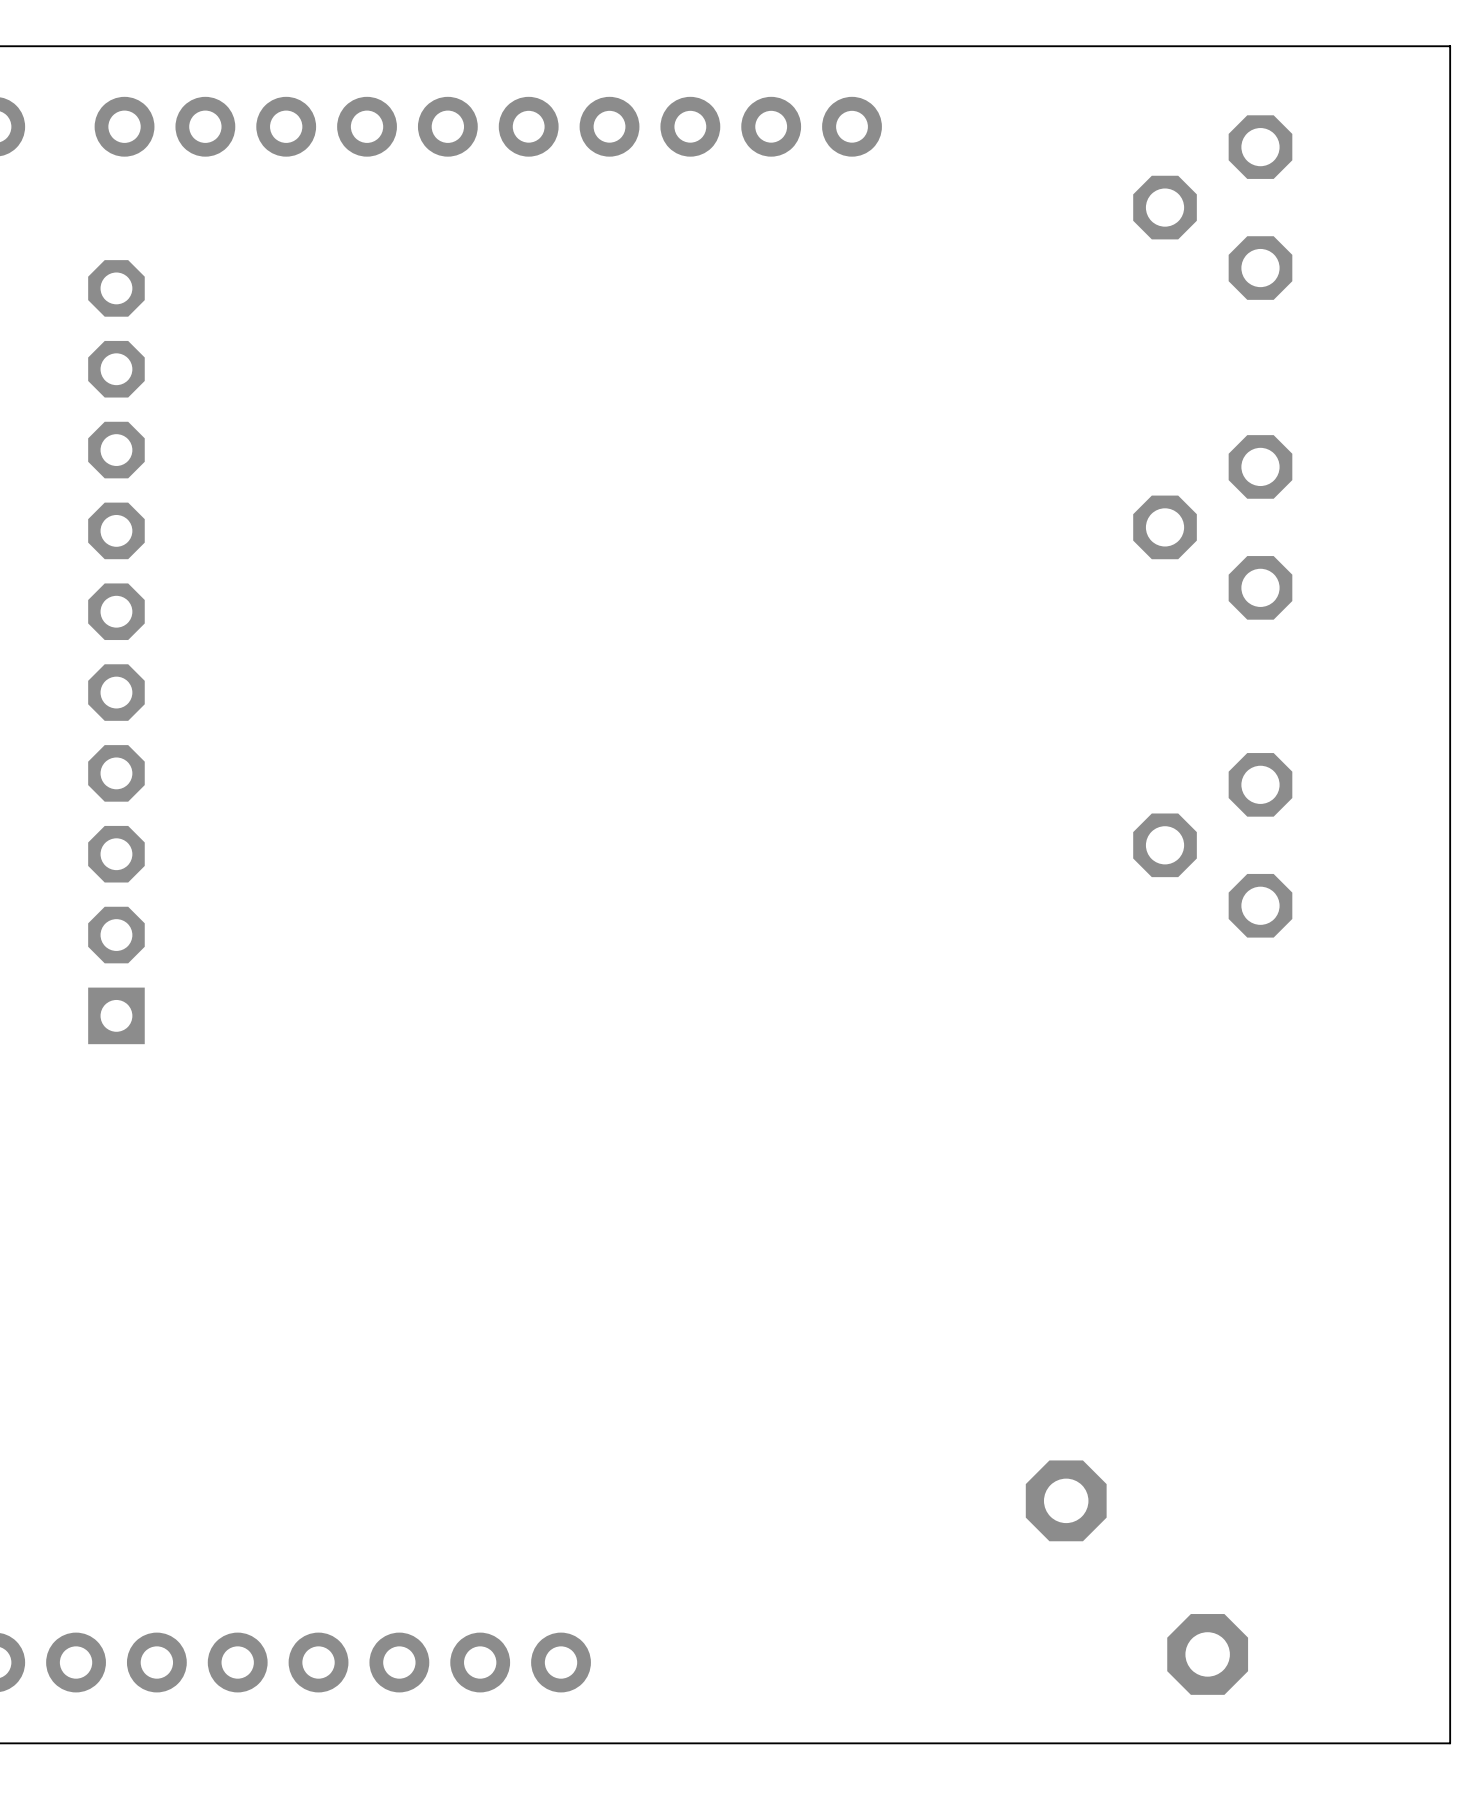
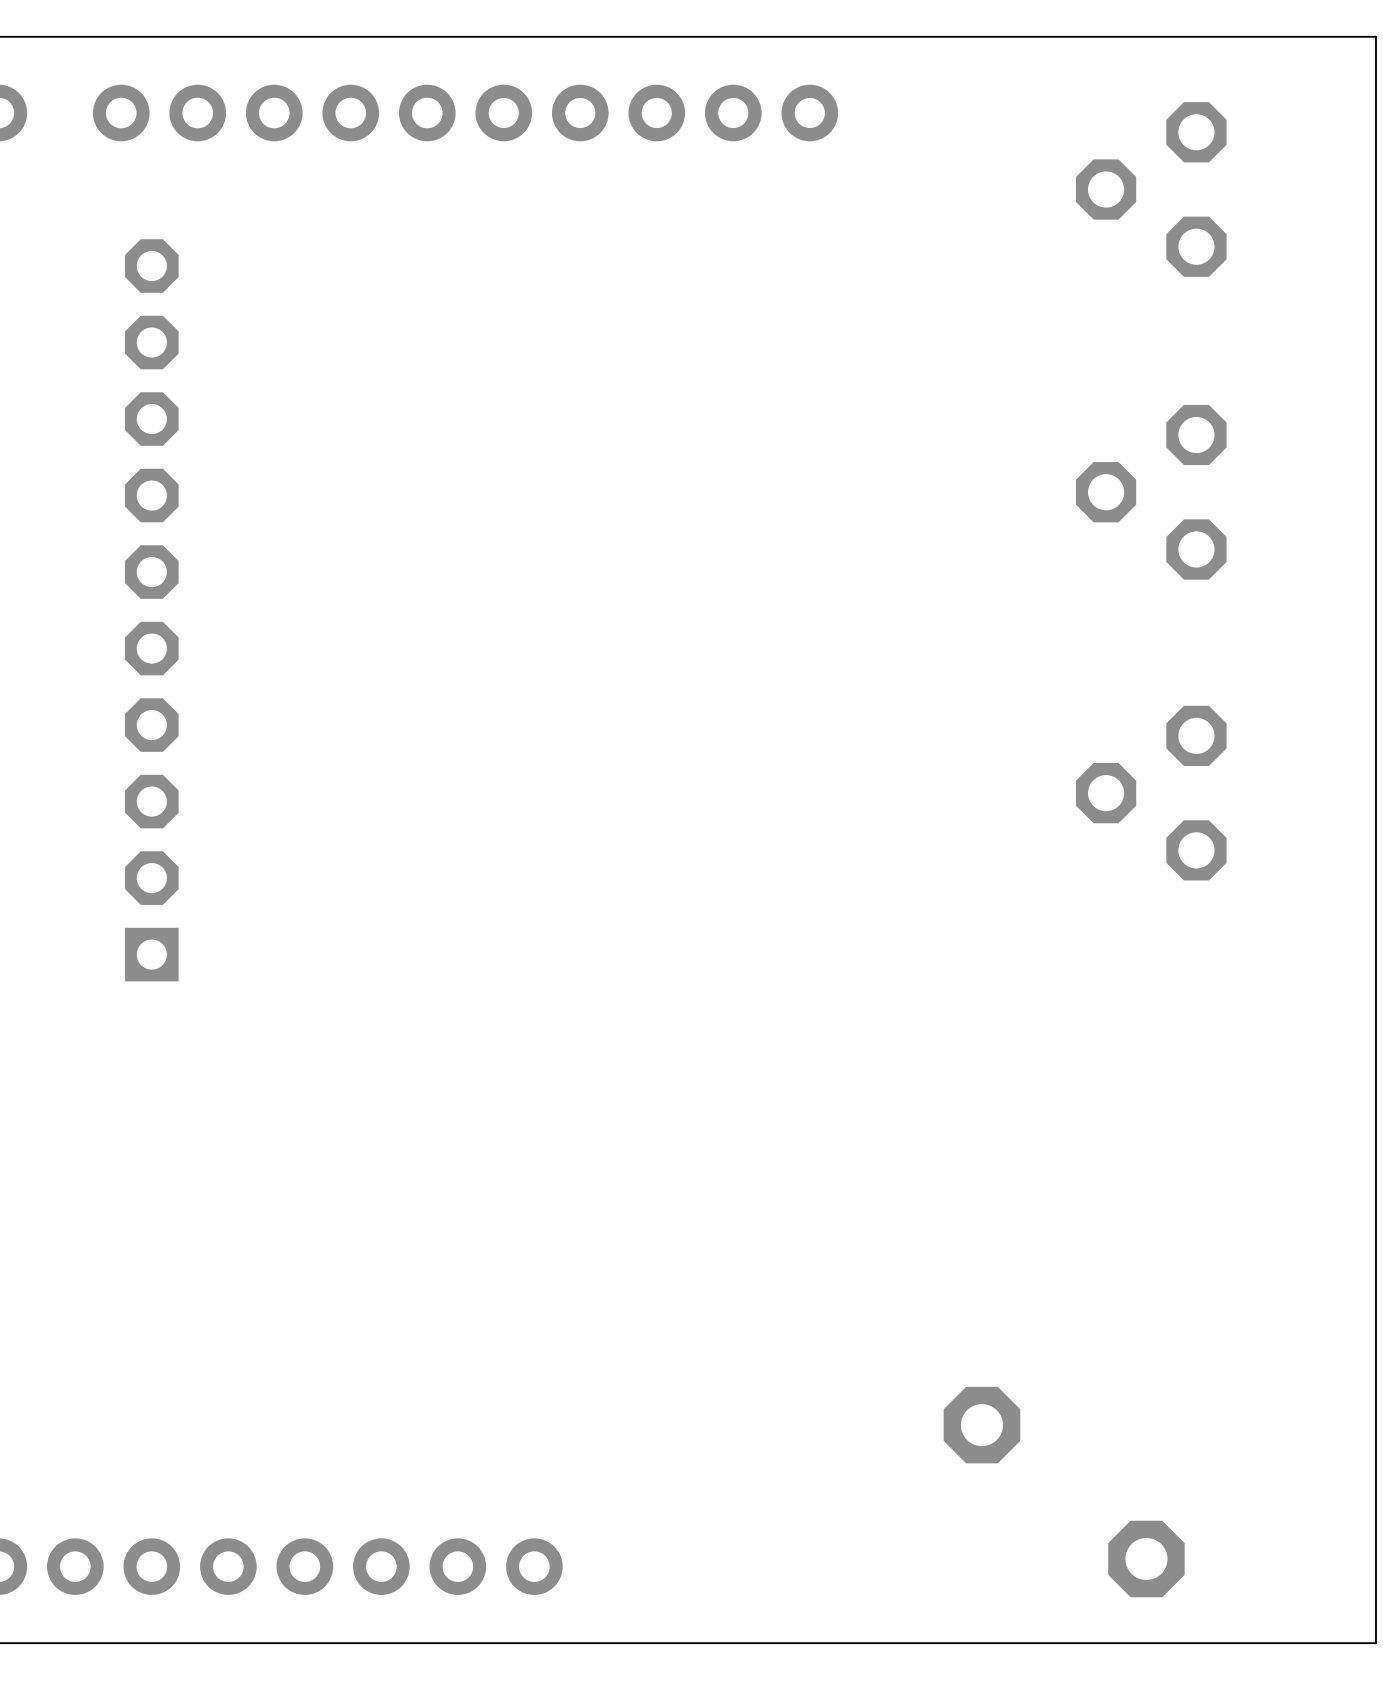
part position: (116, 652) -> (151, 610)
part position: (1066, 1500) -> (981, 1425)

